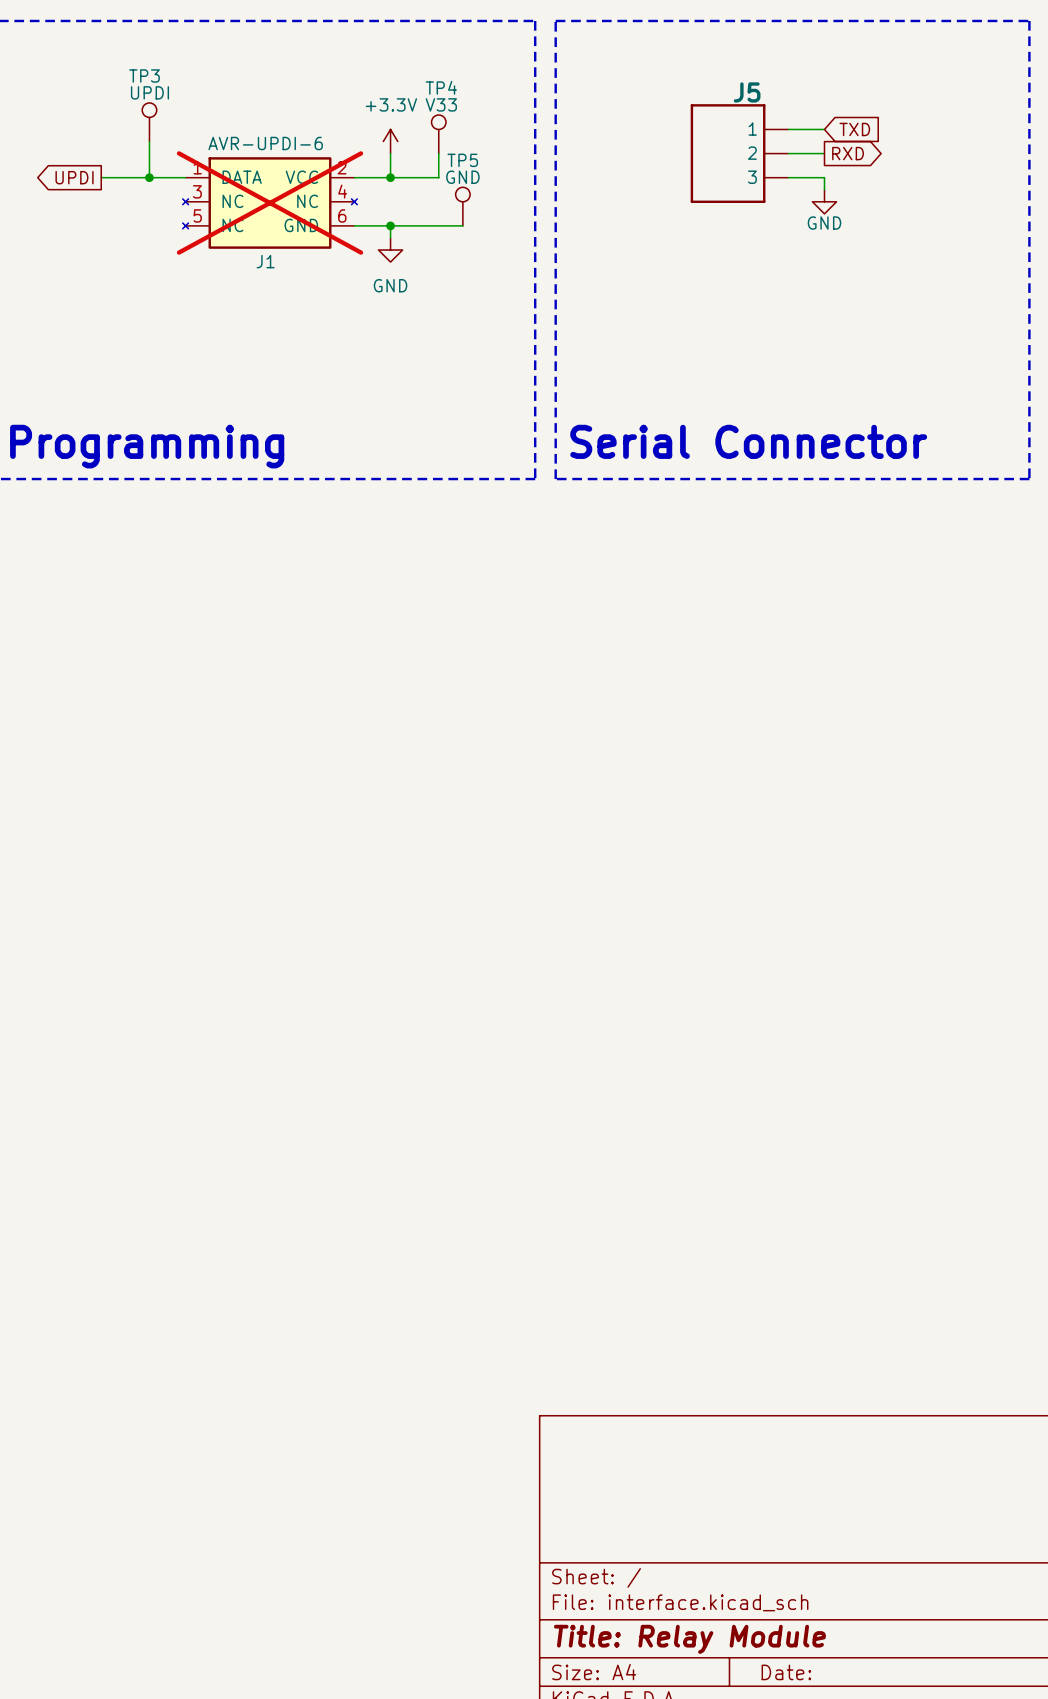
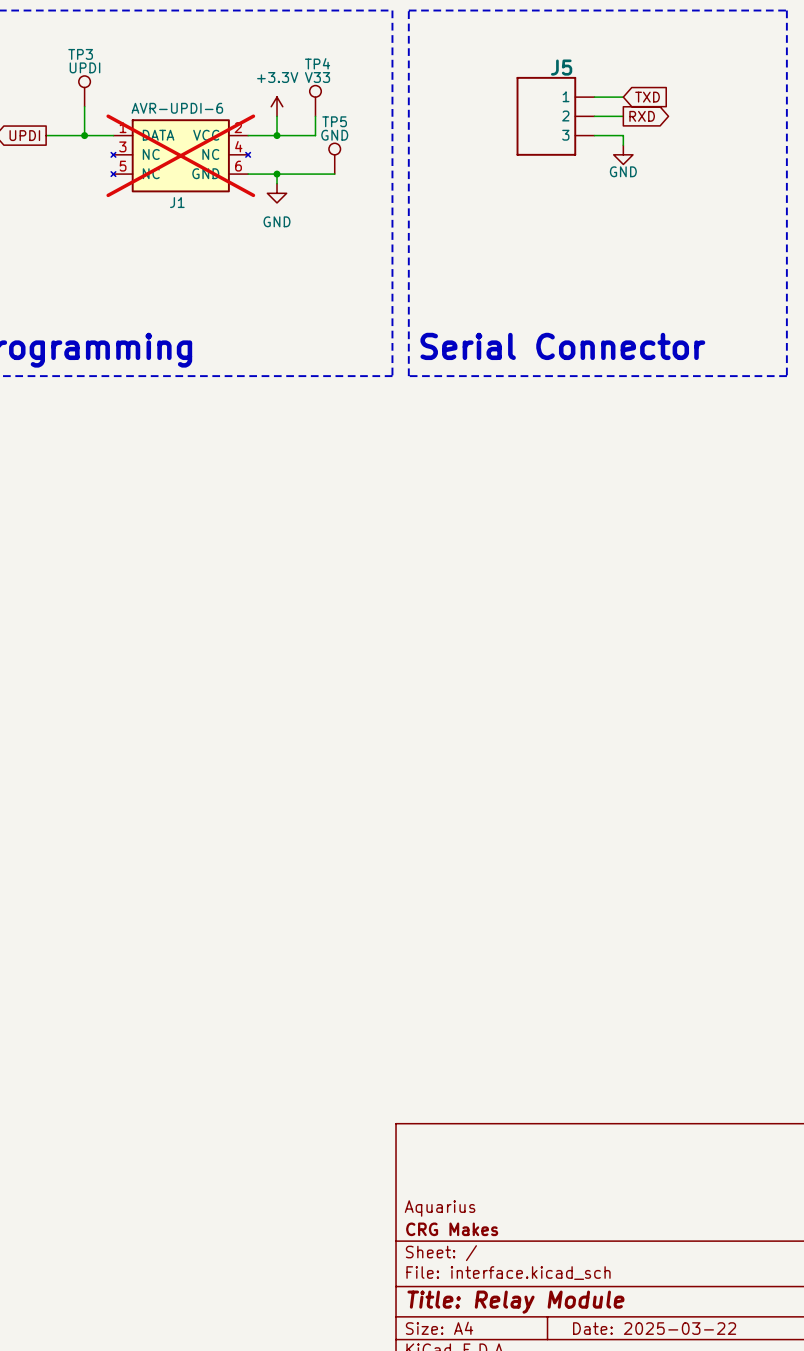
title block: none -> Aquarius (440, 1208)
title block: none -> CRG Makes (452, 1229)
title block: Date: (786, 1672) -> Date: 2025-03-22 (654, 1328)

